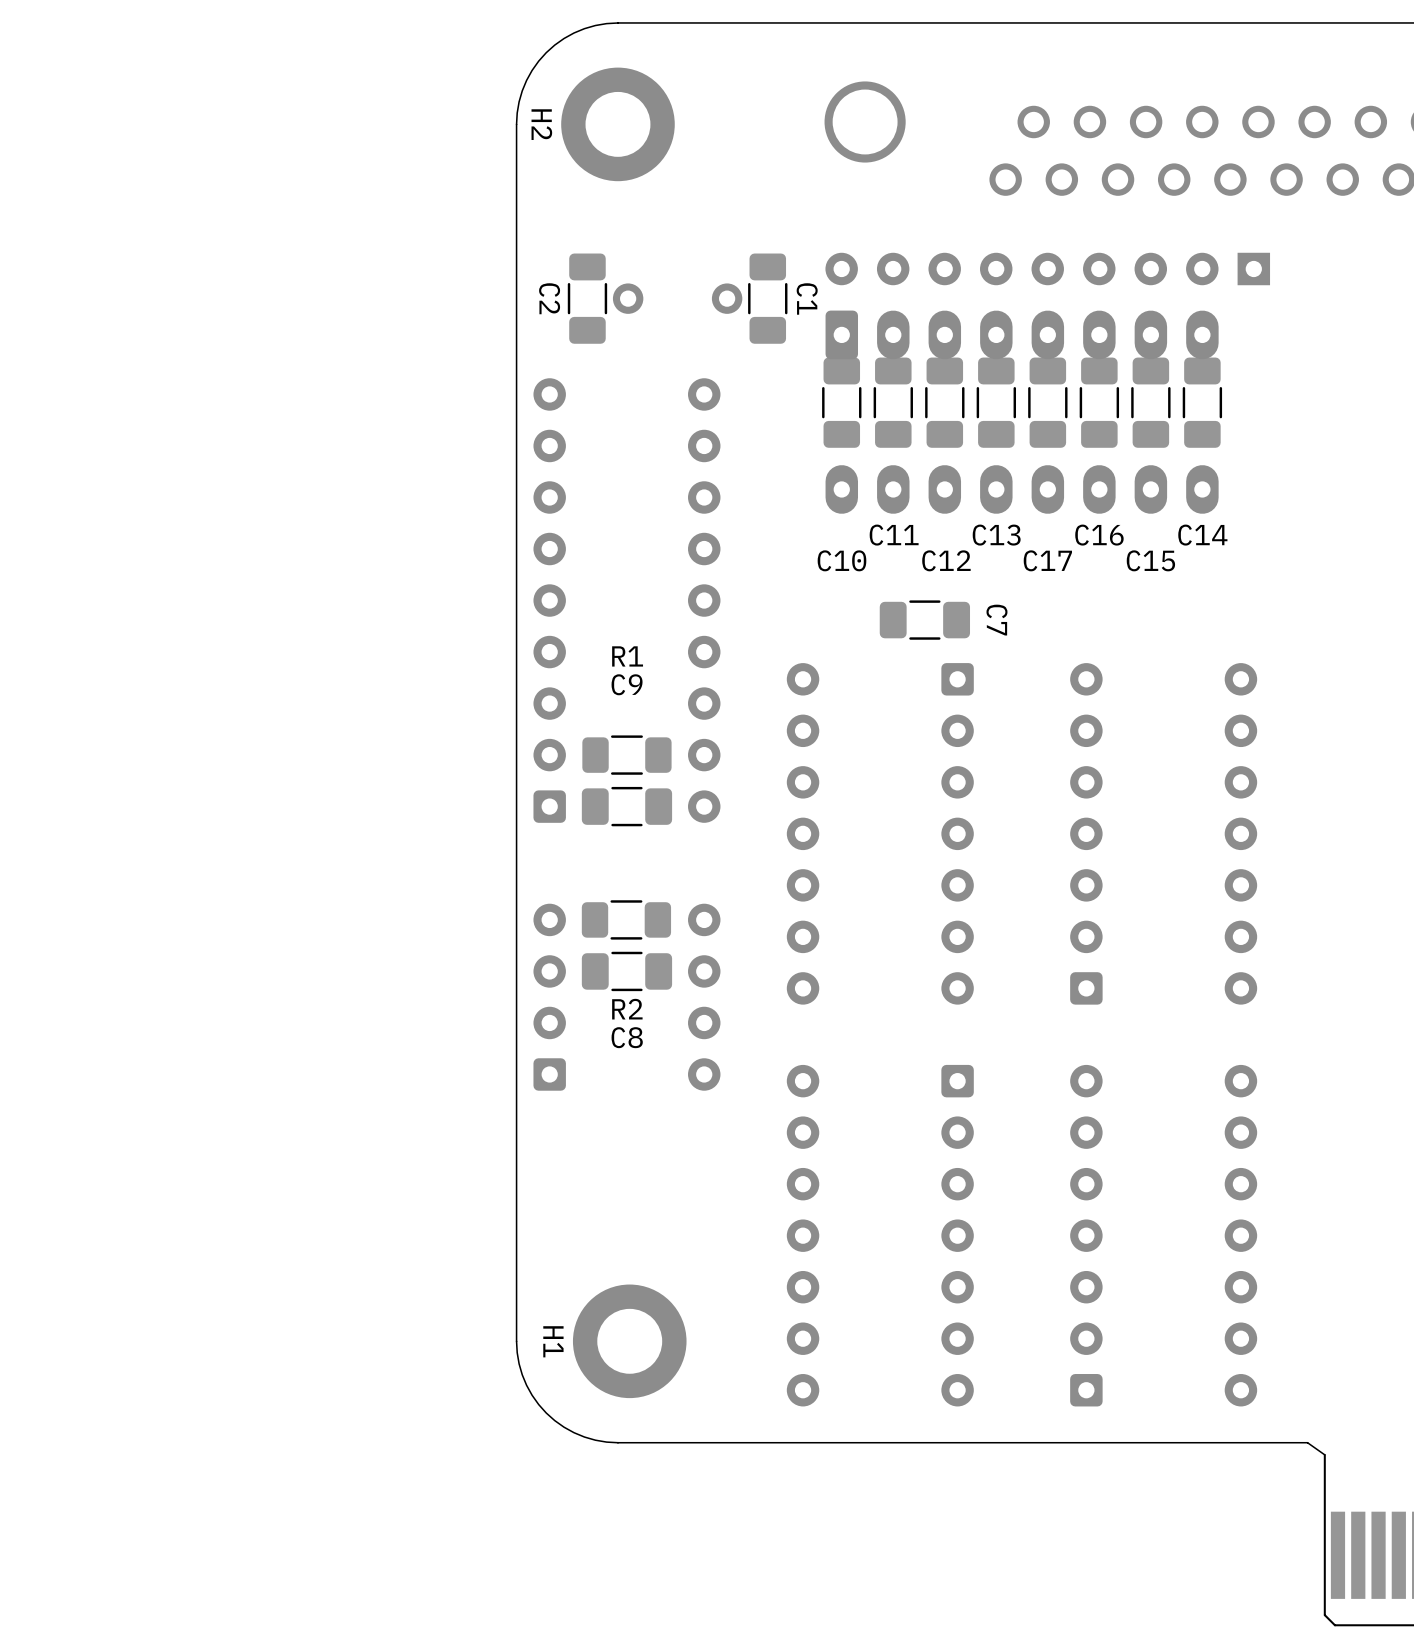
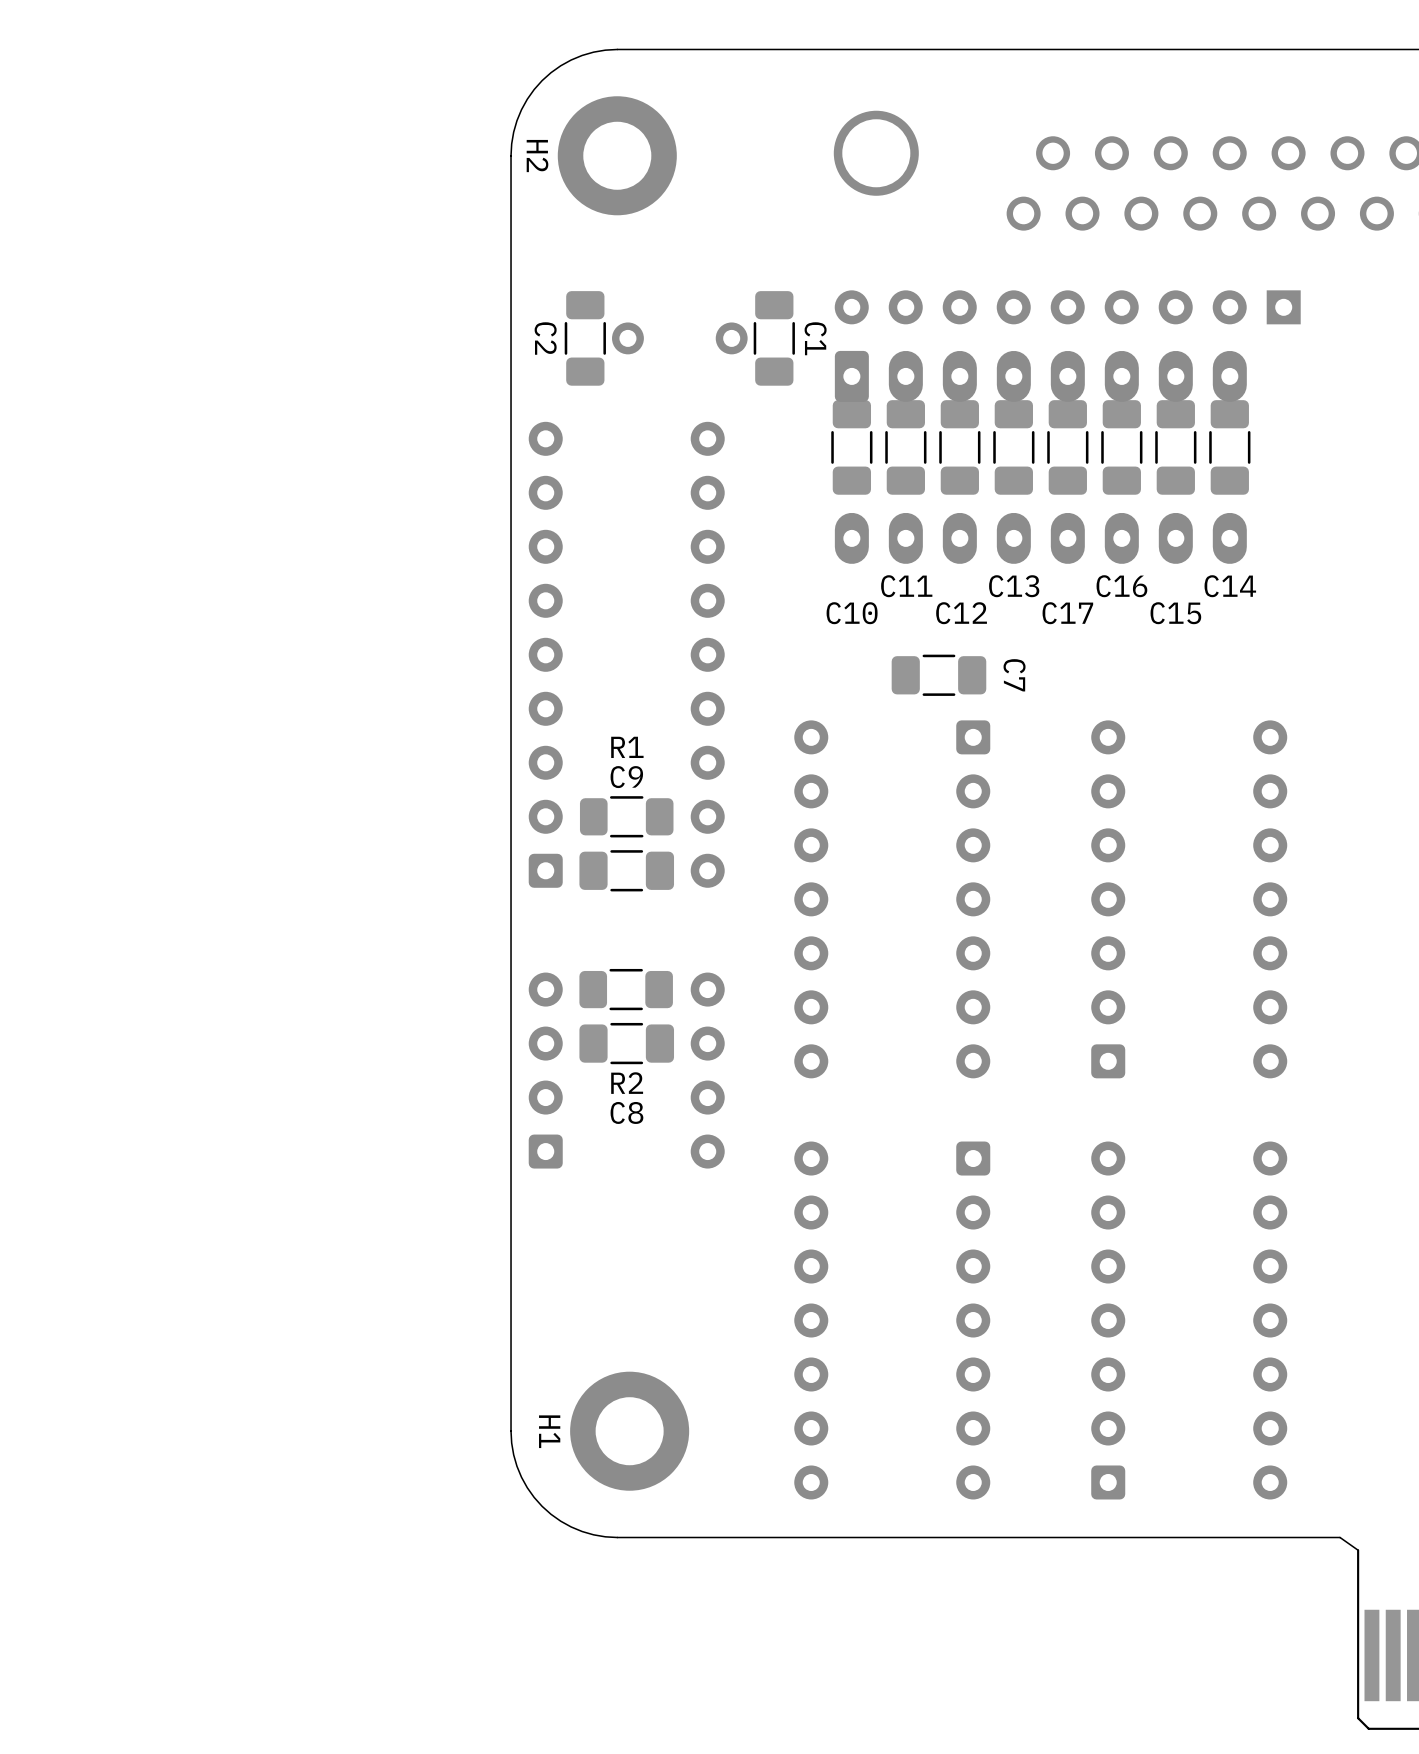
R1 name position: R1 (627, 656) -> R1 (627, 747)
C9 name position: C9 (627, 684) -> C9 (626, 777)

